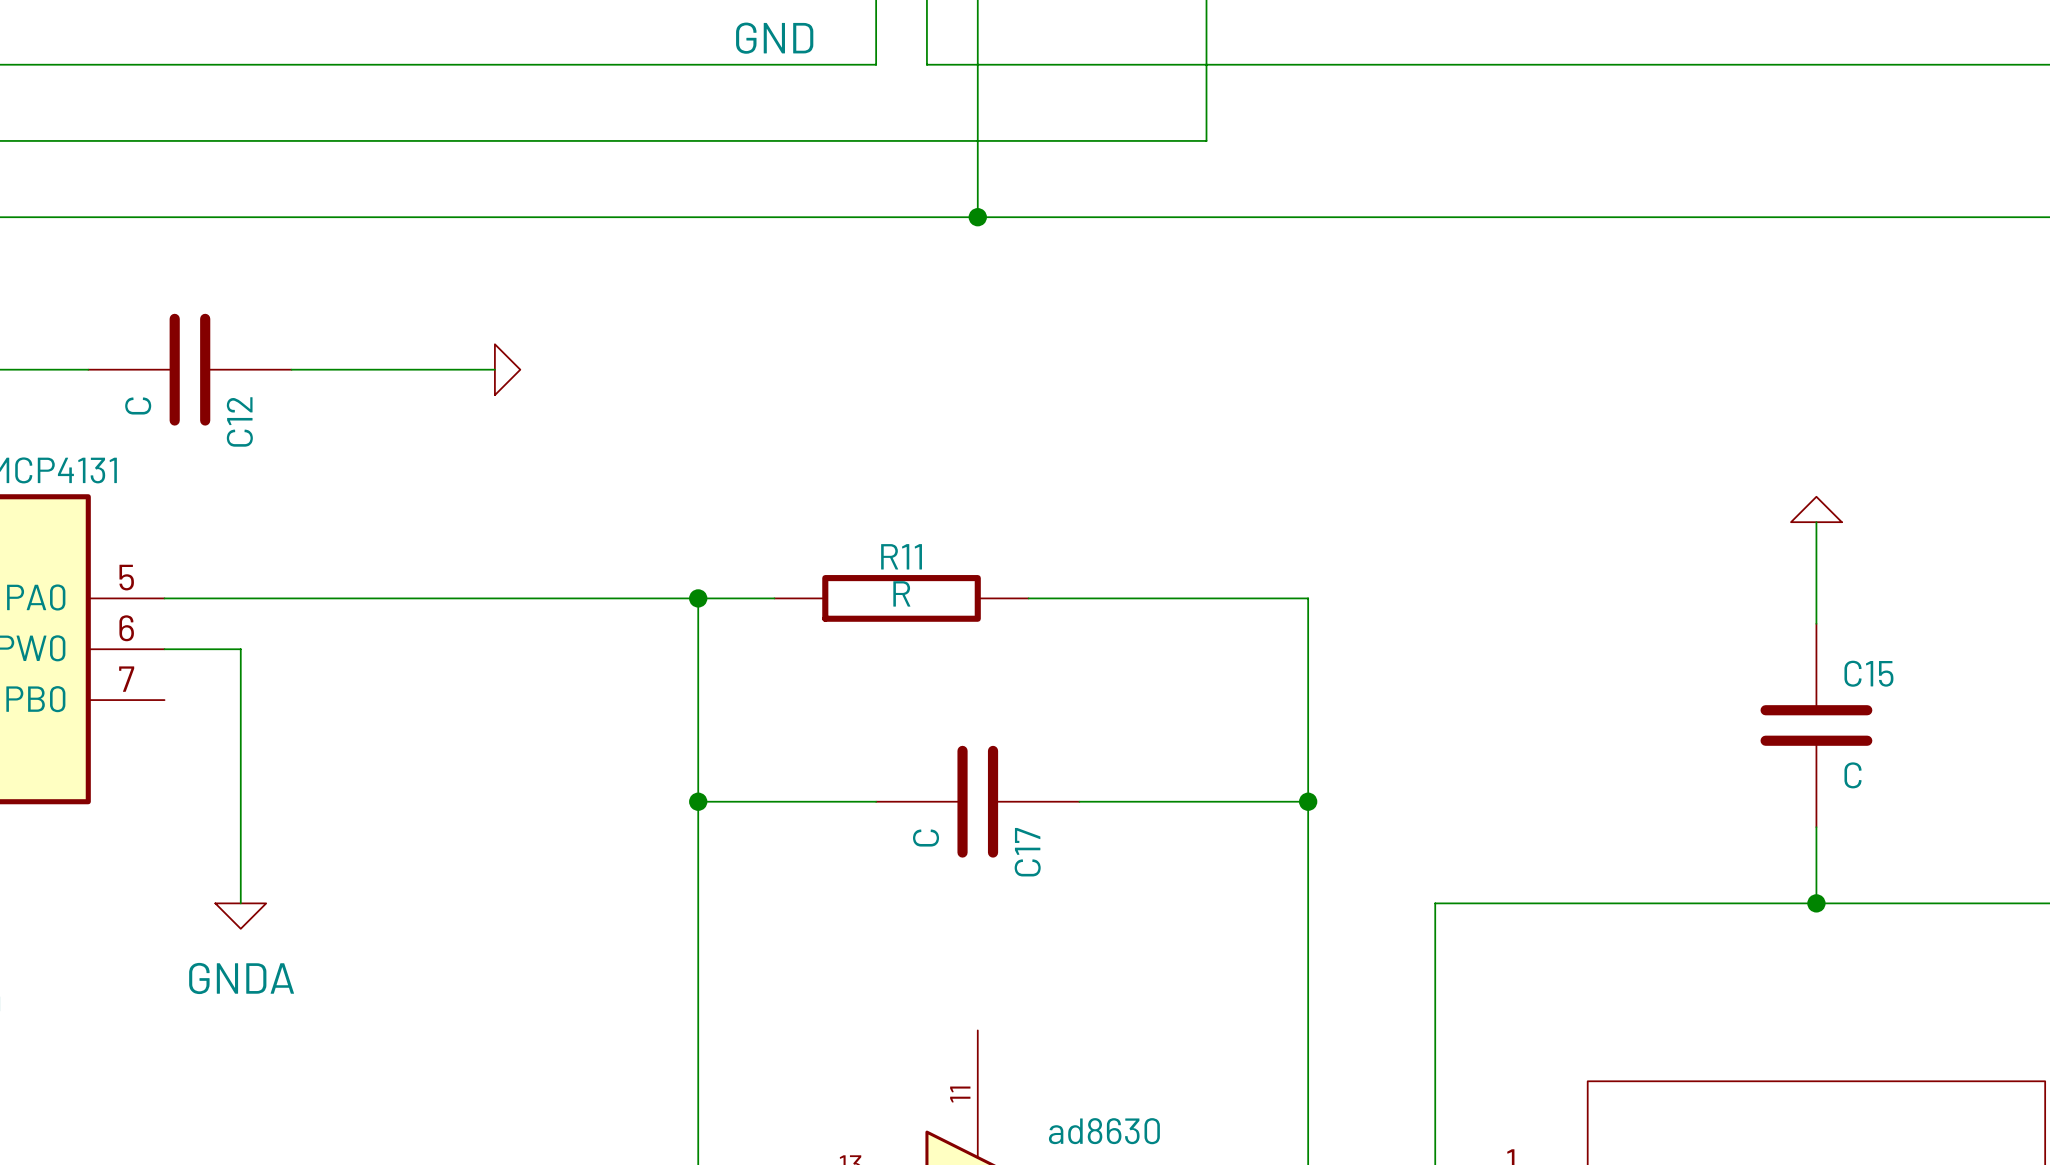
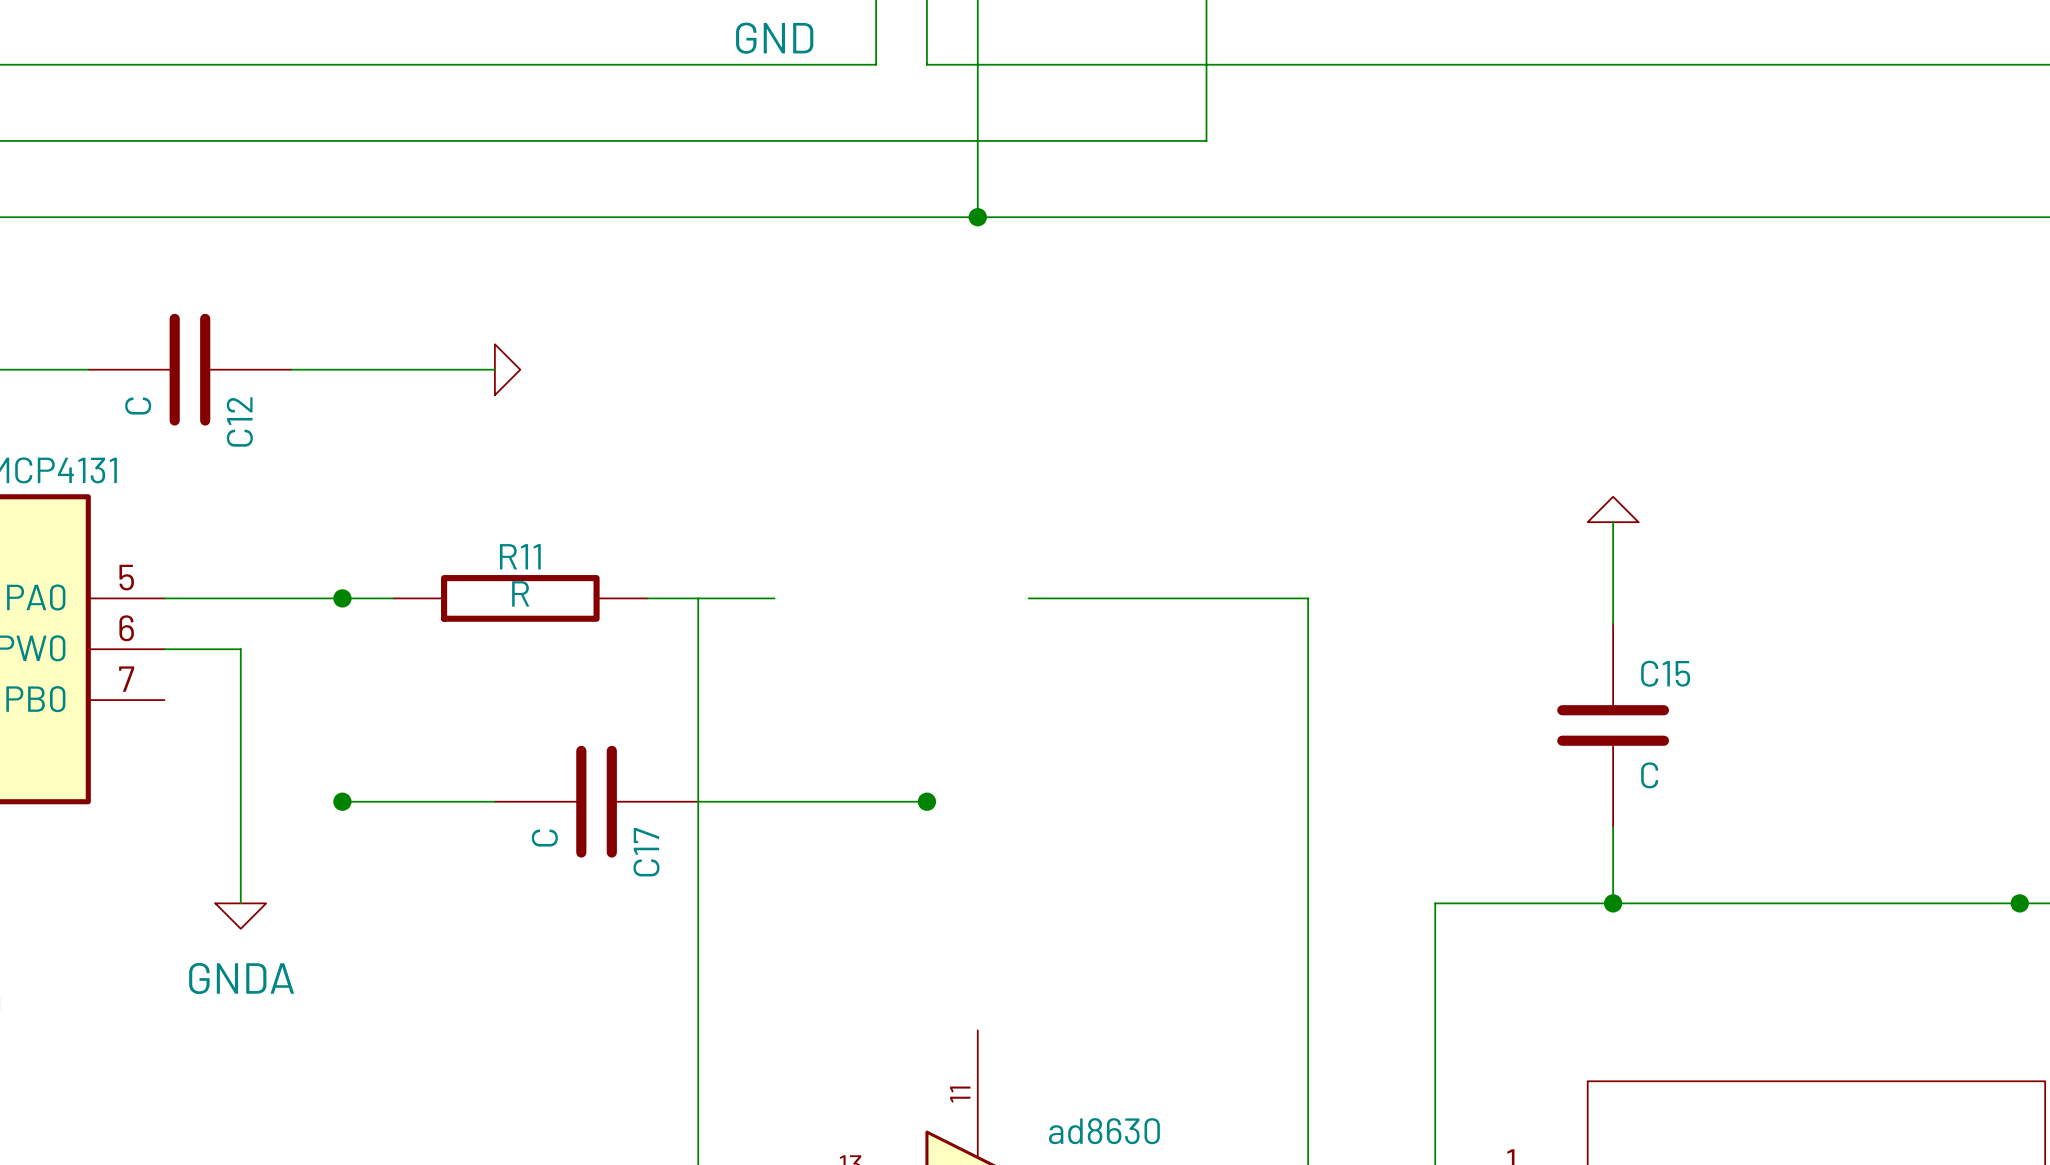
power symbol position: (1816, 509) -> (1613, 509)
wire: (1816, 522) (1816, 623) -> (1613, 522) (1613, 623)
junction: none -> (342, 598)
wire: (393, 598) (647, 598) -> none
junction: (698, 598) -> none
R11 position: (901, 598) -> (520, 598)
C15 position: (1816, 725) -> (1613, 725)
wire: none -> (342, 801) (494, 801)
junction: none -> (342, 801)
junction: (698, 801) -> none
junction: none -> (926, 801)
C17 position: (977, 801) -> (596, 801)
wire: (1079, 801) (1308, 801) -> none
junction: (1308, 801) -> none
wire: (1816, 827) (1816, 903) -> (1613, 827) (1613, 903)
junction: none -> (1613, 903)
junction: (1816, 903) -> none
junction: none -> (2019, 903)

